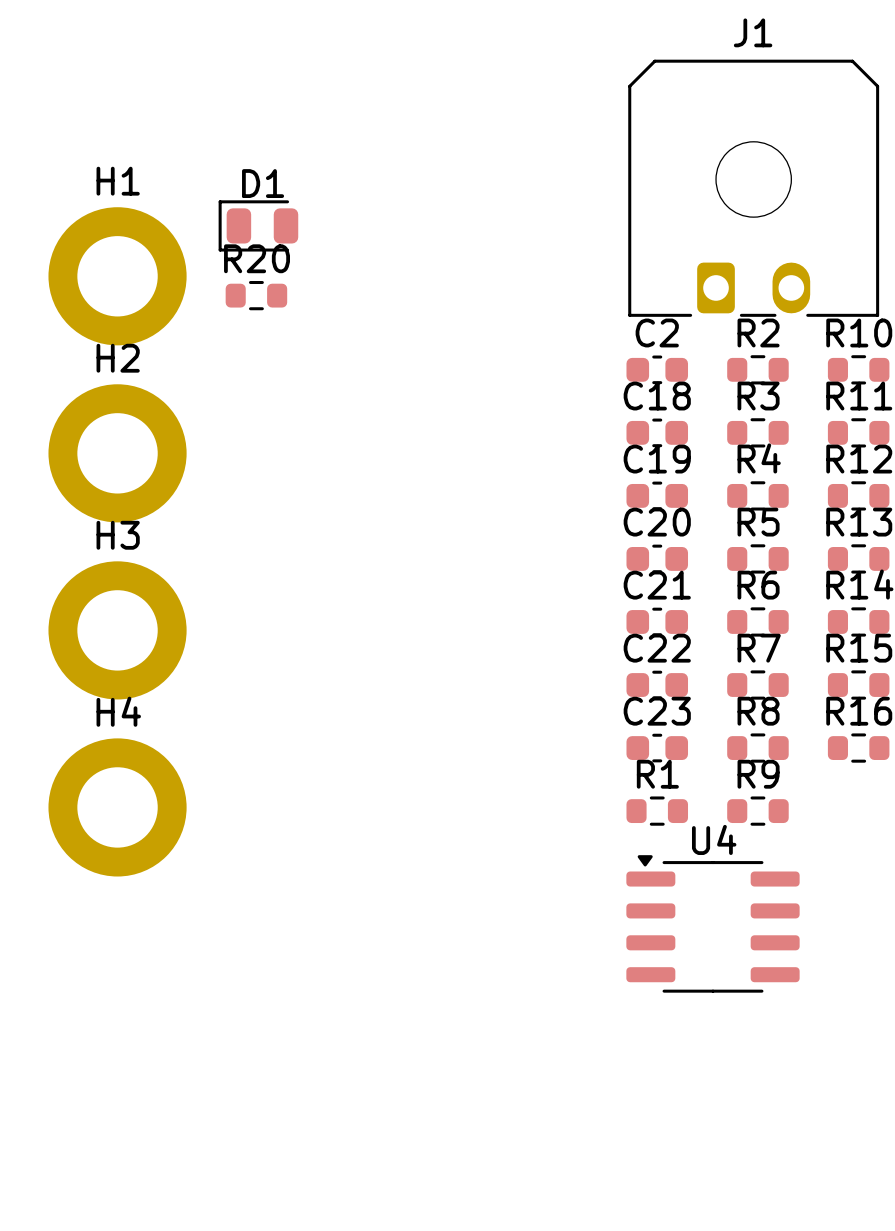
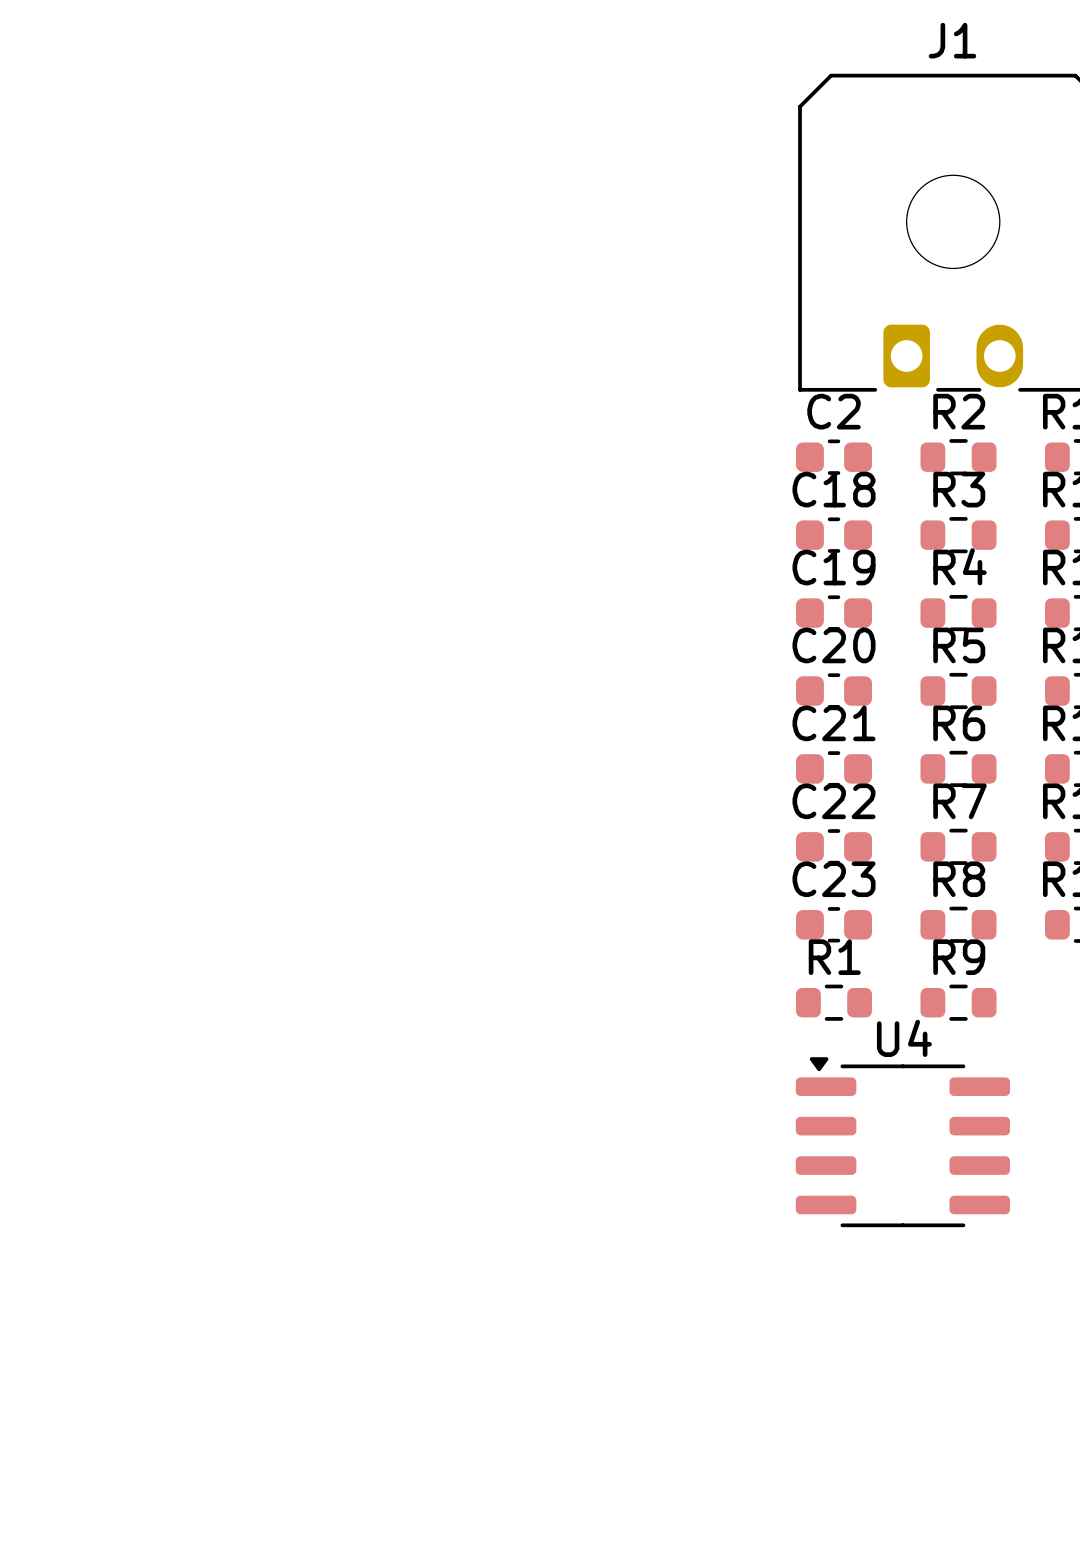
D1: (258, 225) -> none
H1: (117, 276) -> none
R20: (256, 295) -> none
H2: (117, 453) -> none
H3: (117, 630) -> none
H4: (117, 807) -> none

